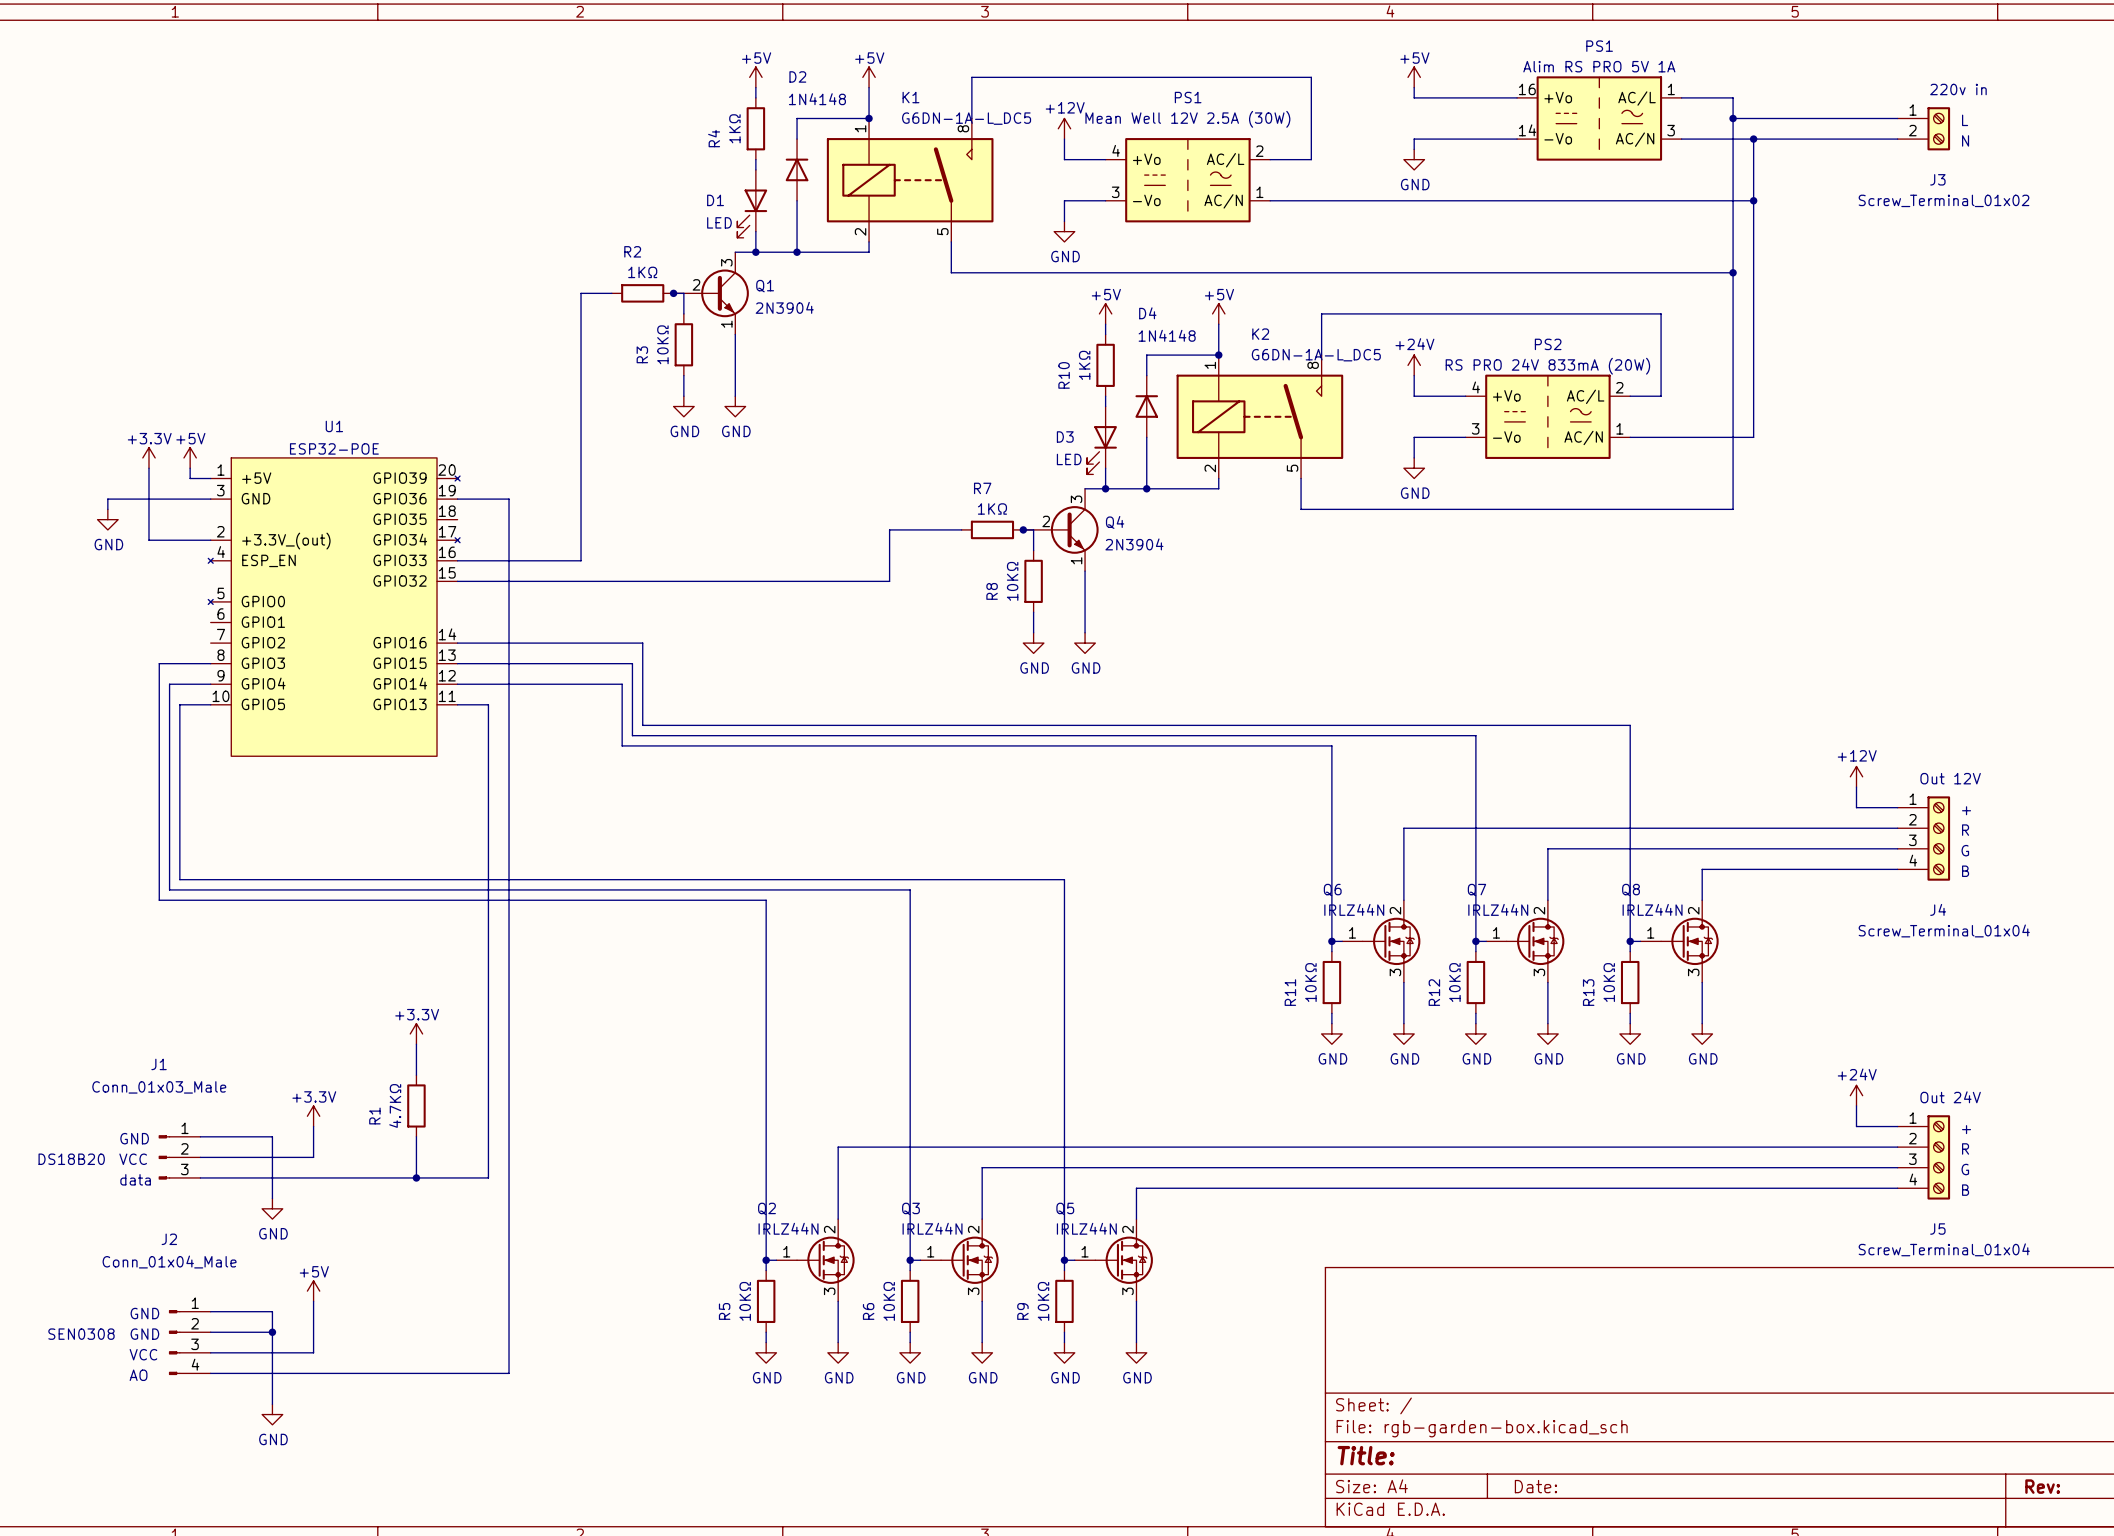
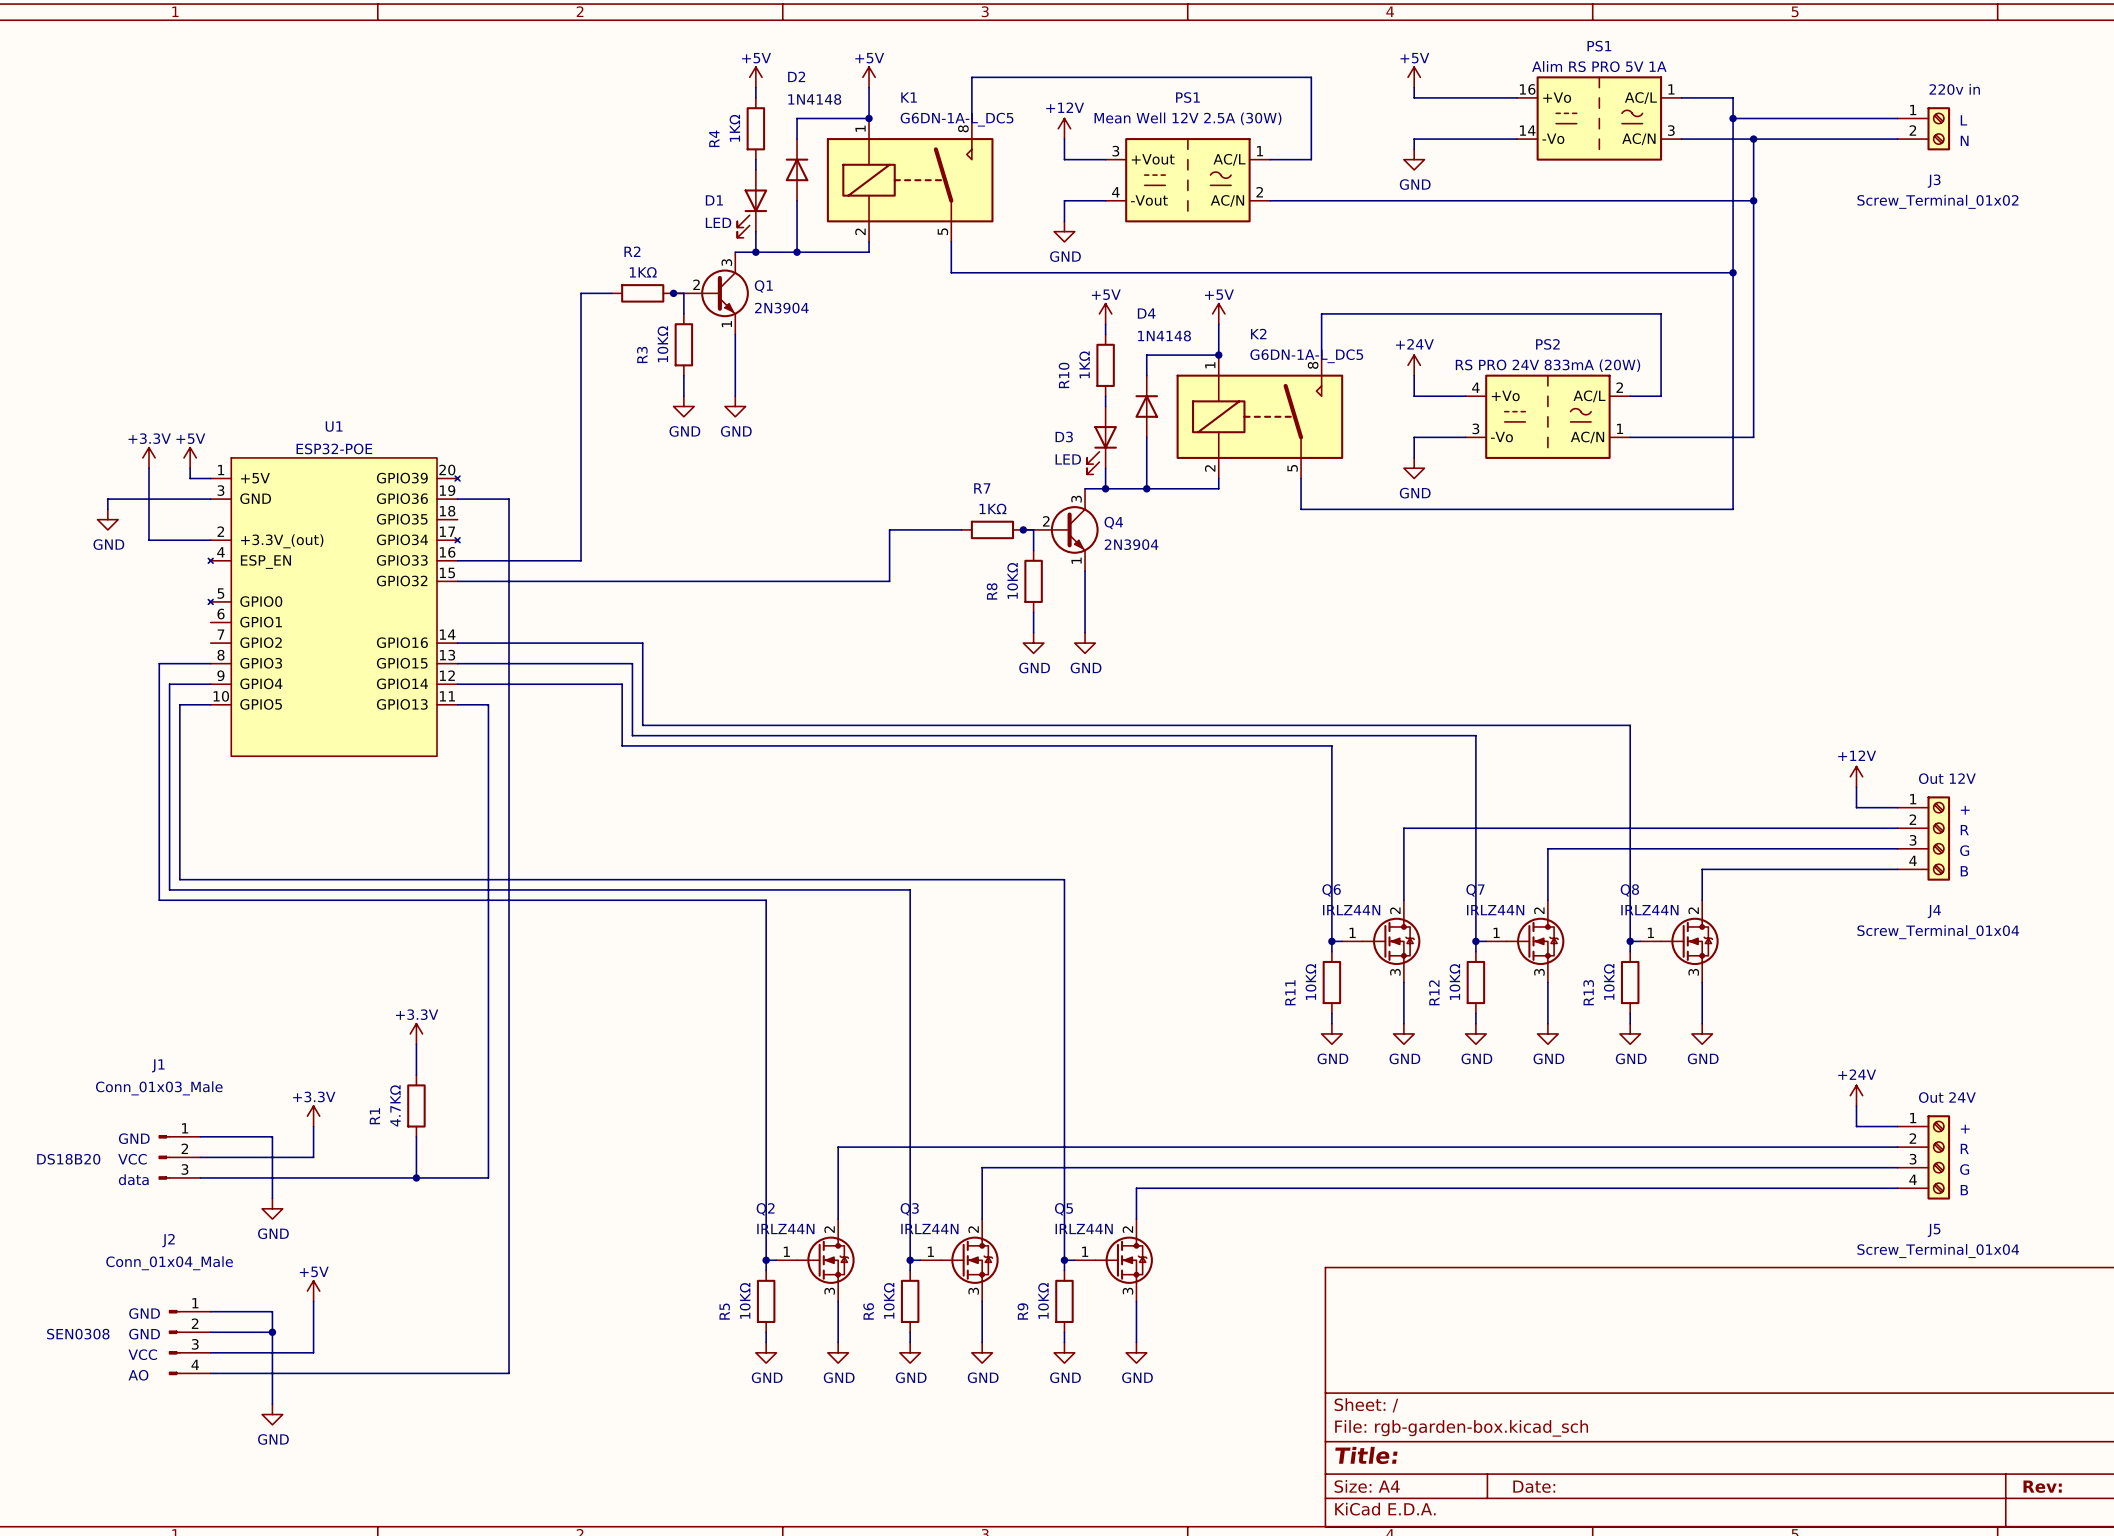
PS1 pin number: 4 (1116, 150) -> 3 (1115, 151)
PS1 pin number: 2 (1259, 151) -> 1 (1260, 151)
PS1 pin name: +Vo (1146, 159) -> +Vout (1153, 159)
PS1 pin number: 3 (1115, 192) -> 4 (1115, 192)
PS1 pin number: 1 (1259, 192) -> 2 (1259, 192)
PS1 pin name: -Vo (1146, 200) -> -Vout (1149, 200)

